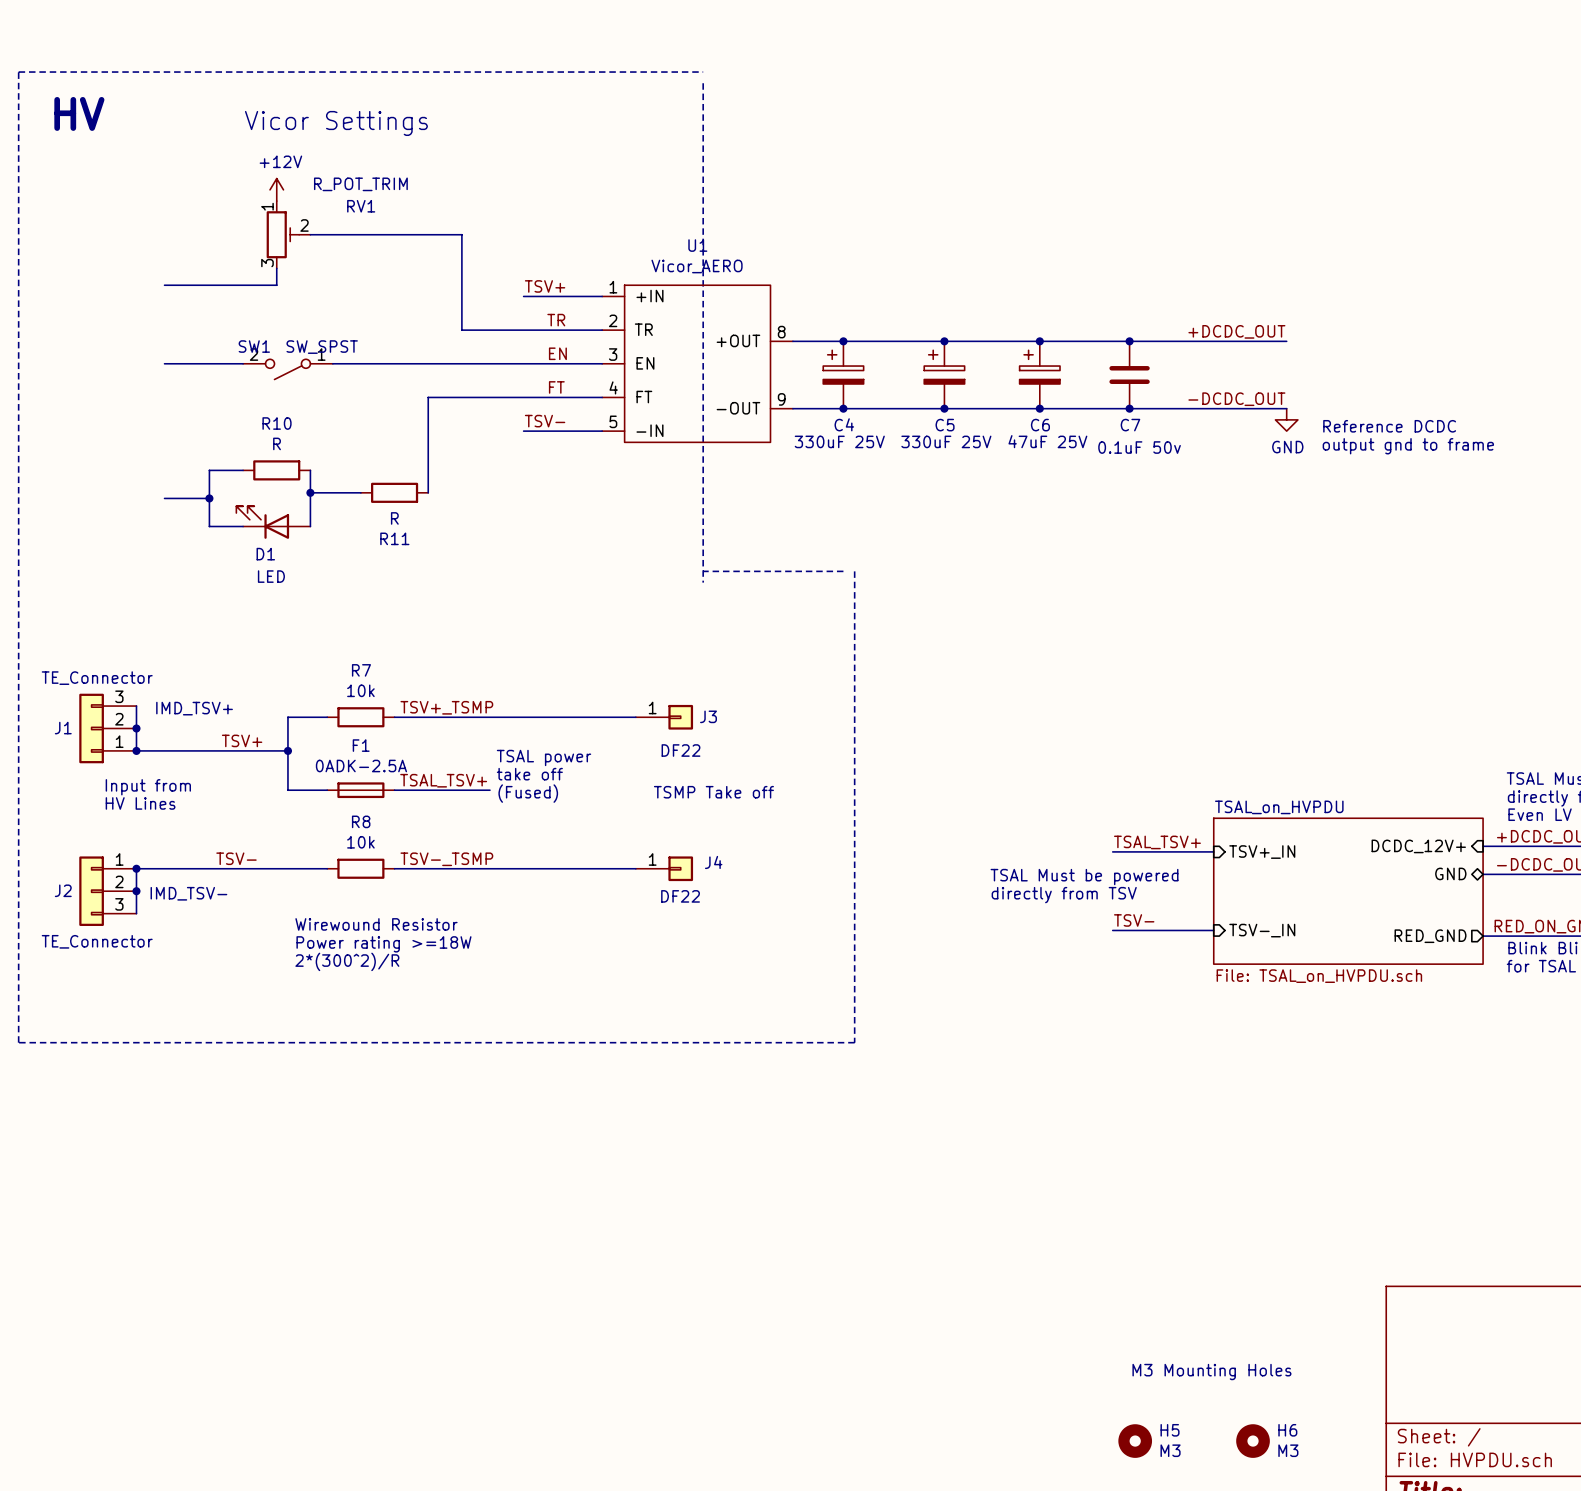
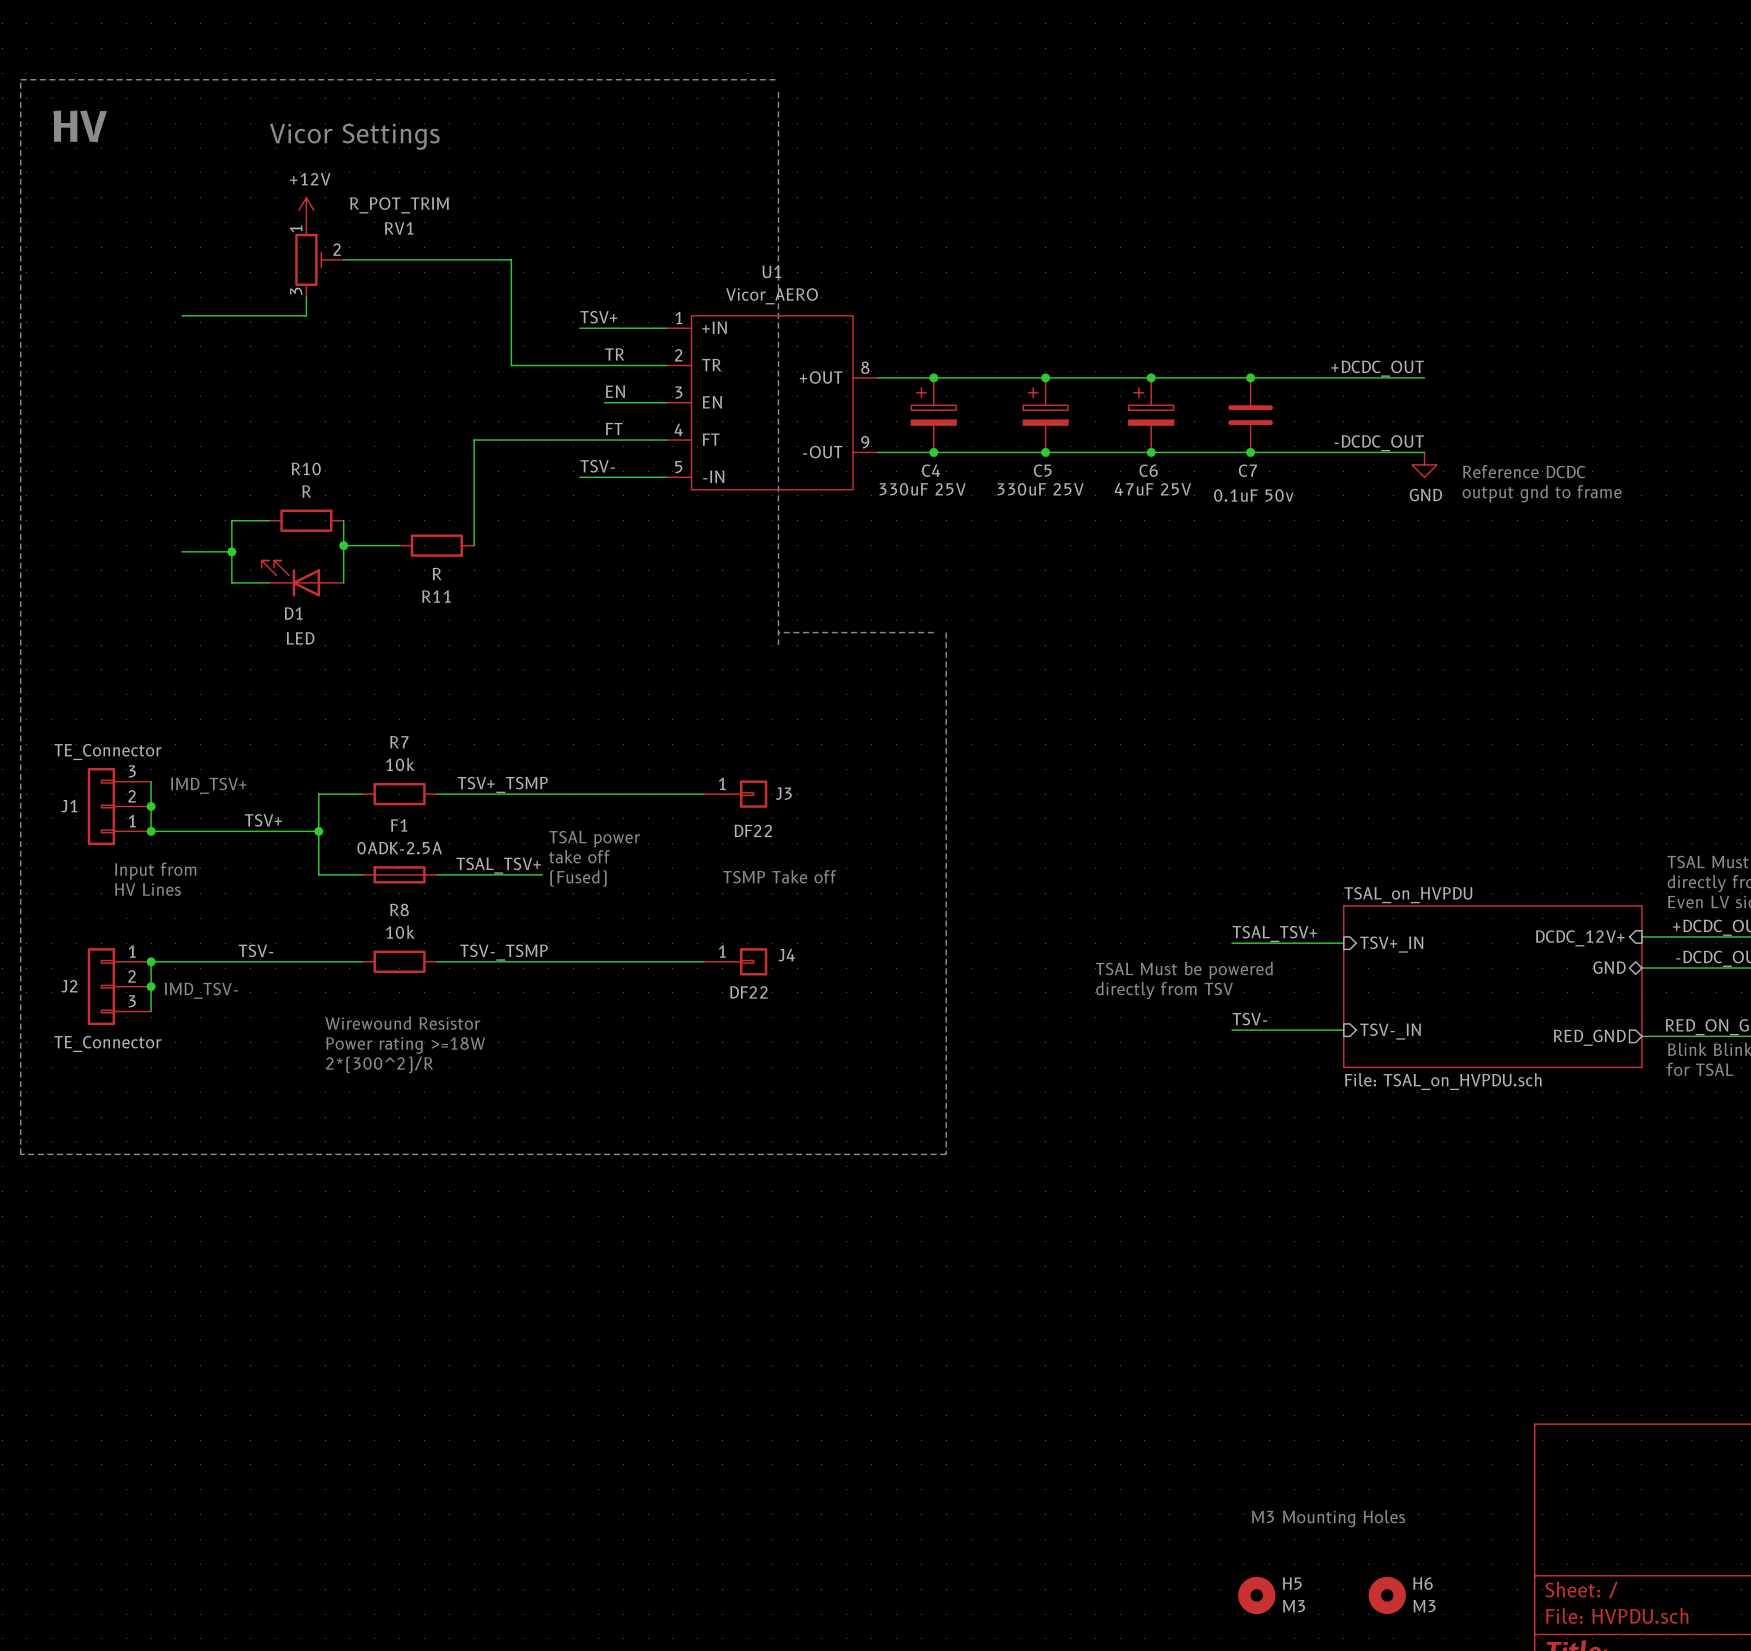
wire: (164, 363) (243, 363) -> none
wire: (332, 363) (546, 363) -> none
SW1: SW_SPST (287, 369) -> none

